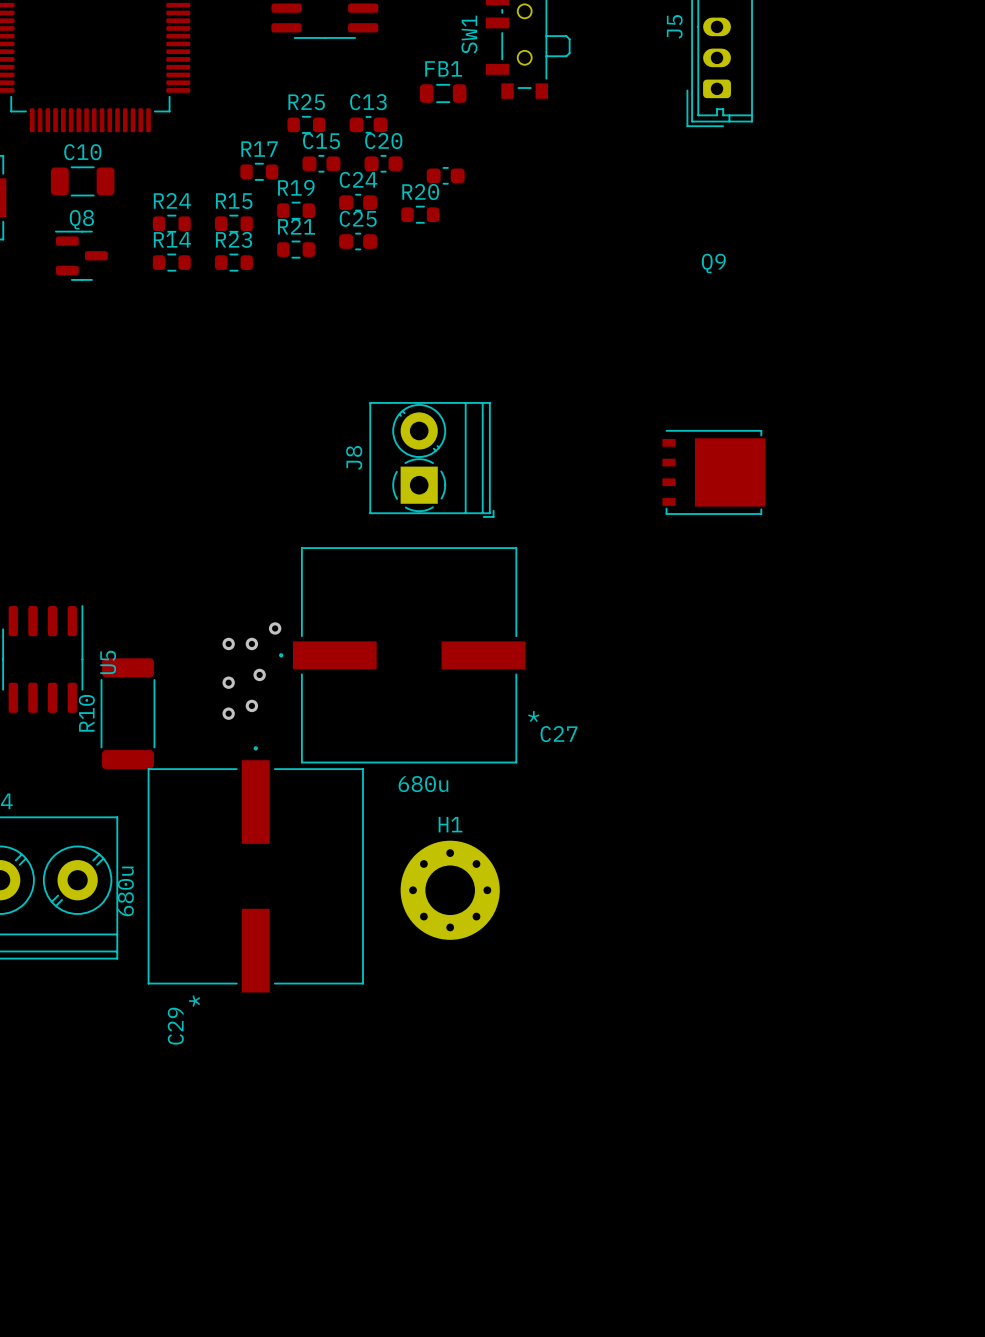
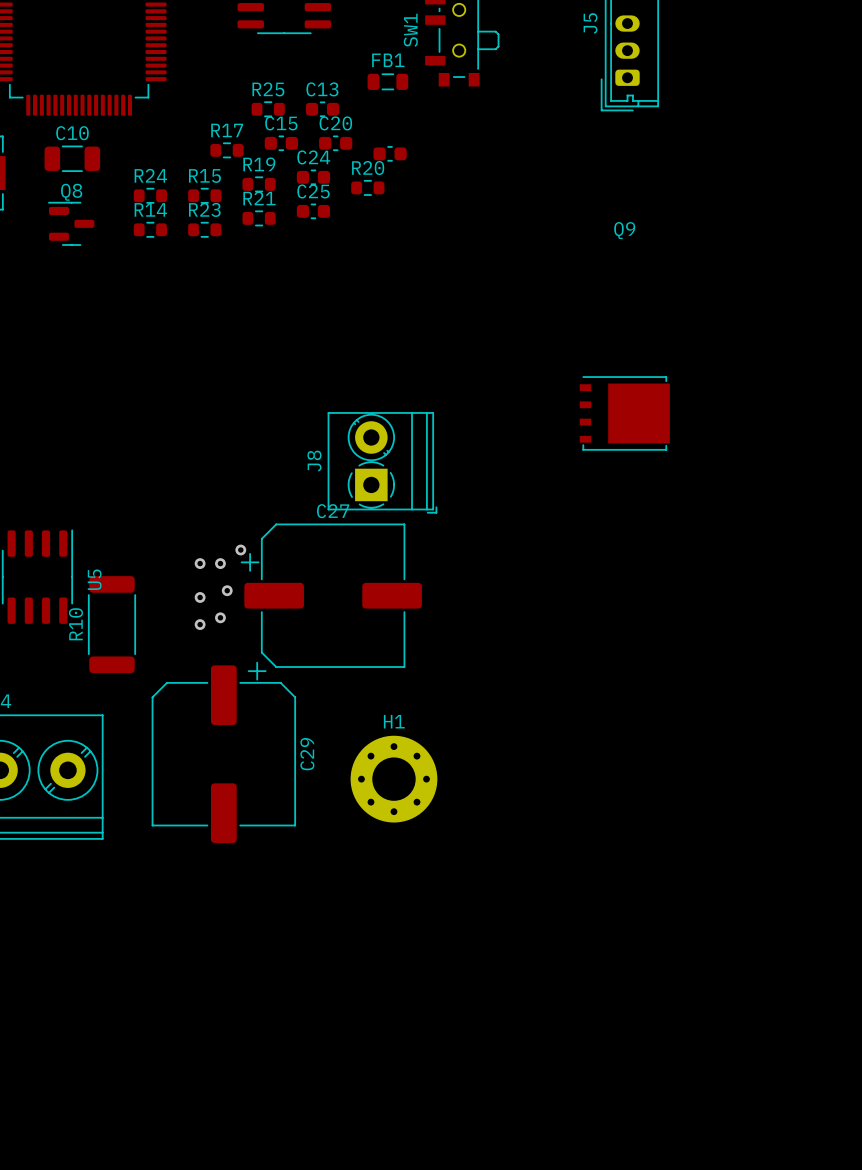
J8 position: (431, 459) -> (382, 462)
C27 footprint: [279, 547, 526, 764] -> [240, 523, 422, 668]
C27 name position: C27 (558, 734) -> C27 (333, 511)
C29 footprint: [147, 746, 364, 993] -> [151, 661, 296, 843]
C27 value: 680u (423, 784) -> none
C29 value: 680u (125, 891) -> none
C29 name position: C29 (175, 1026) -> C29 (307, 754)

